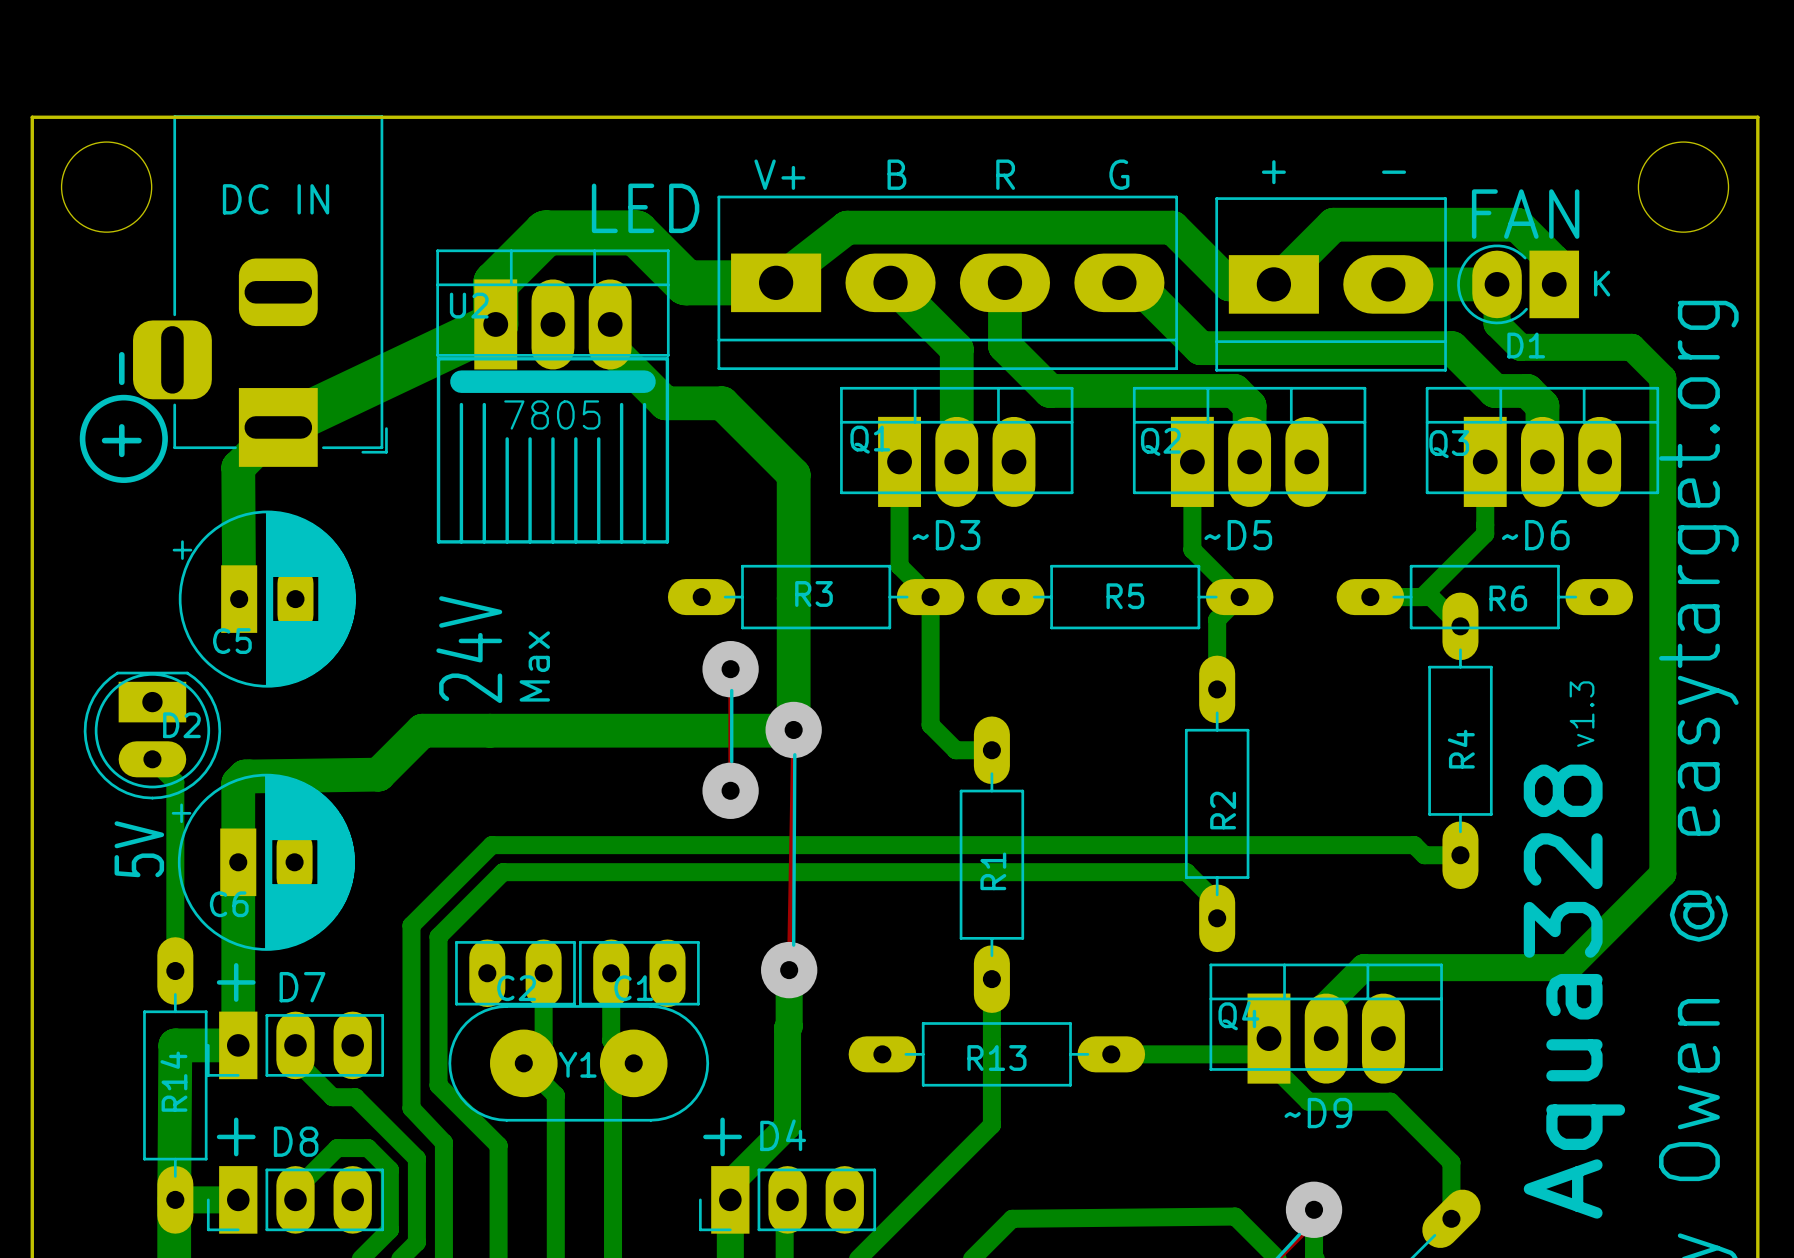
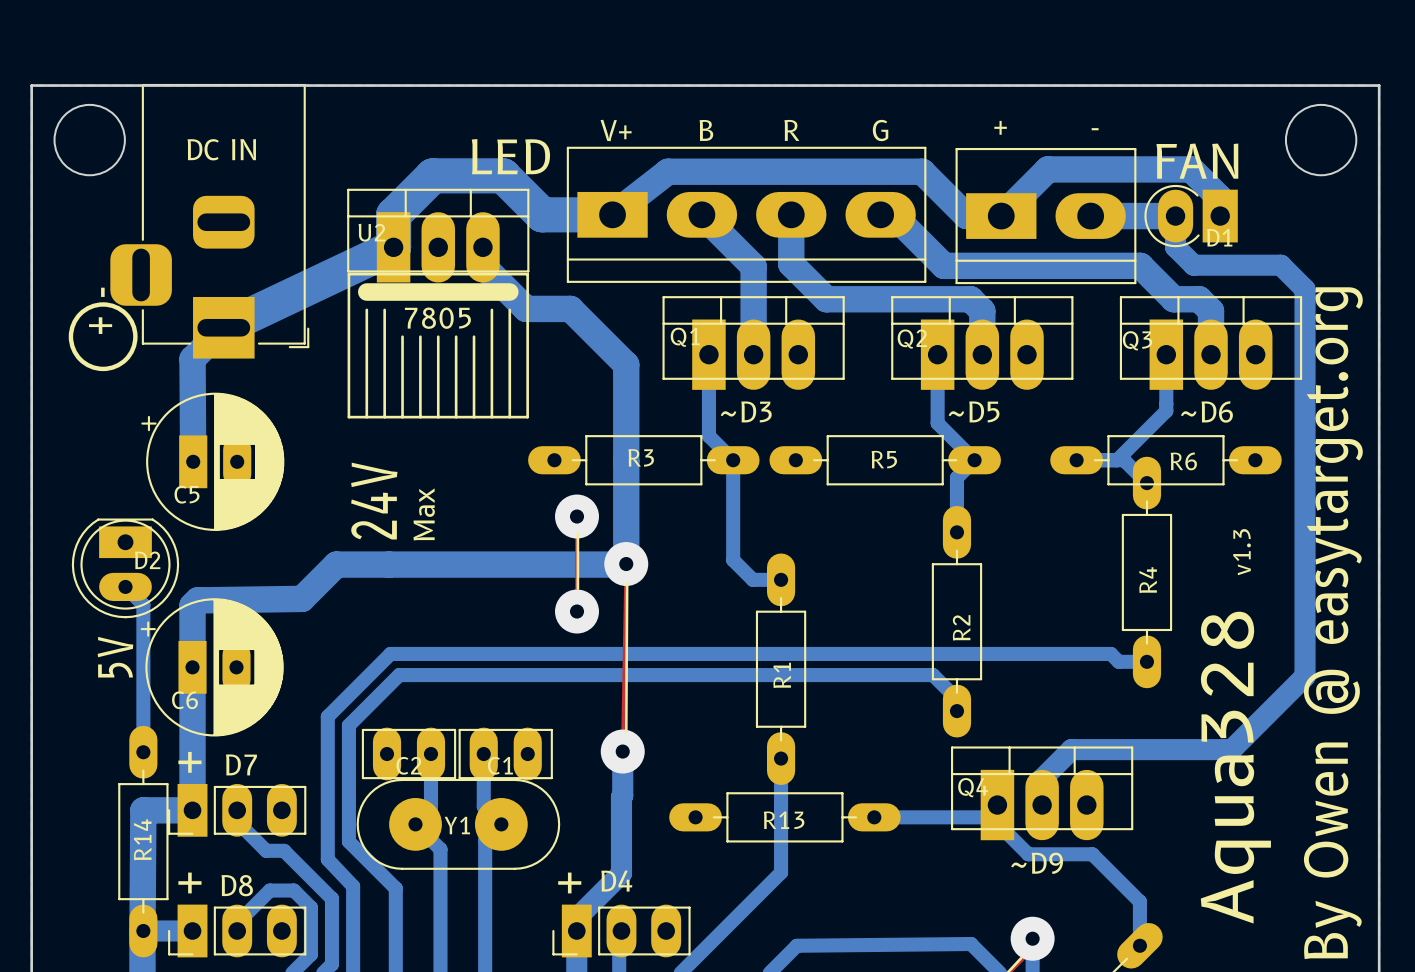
D1 footprint: [1457, 244, 1580, 325] -> [1144, 184, 1238, 248]

